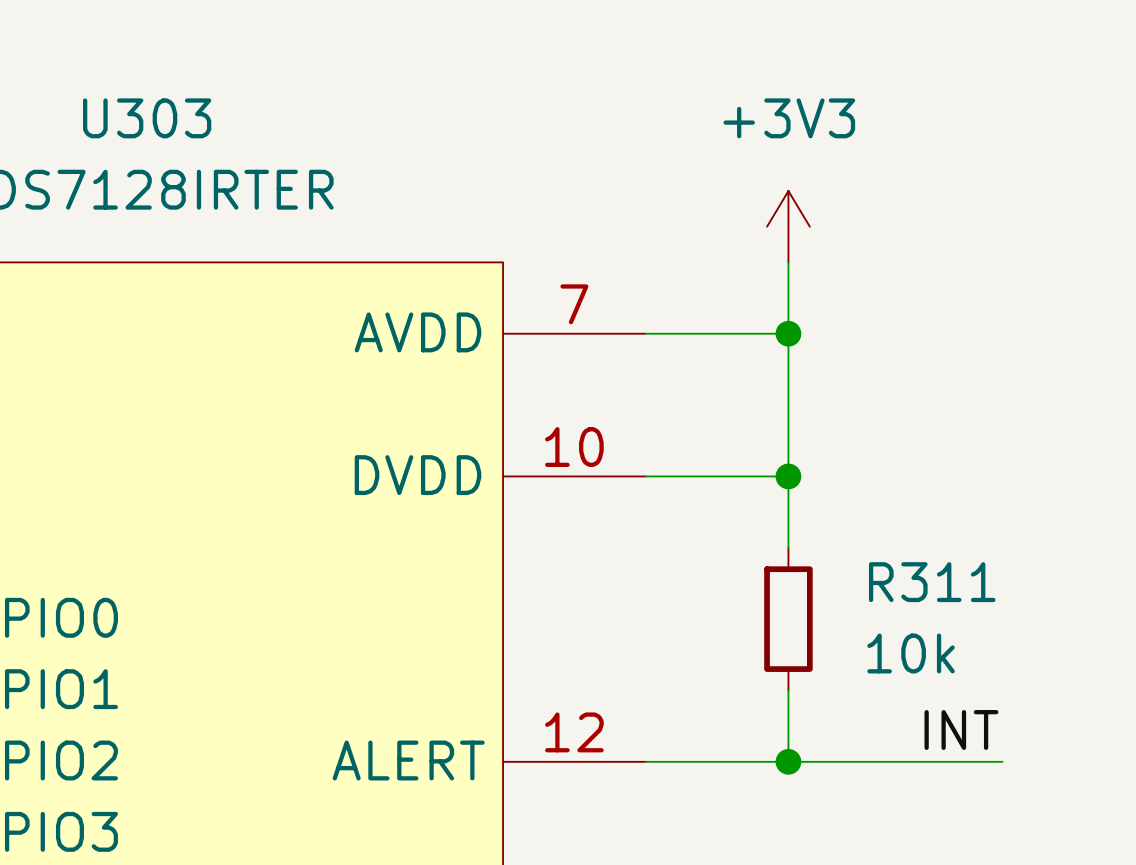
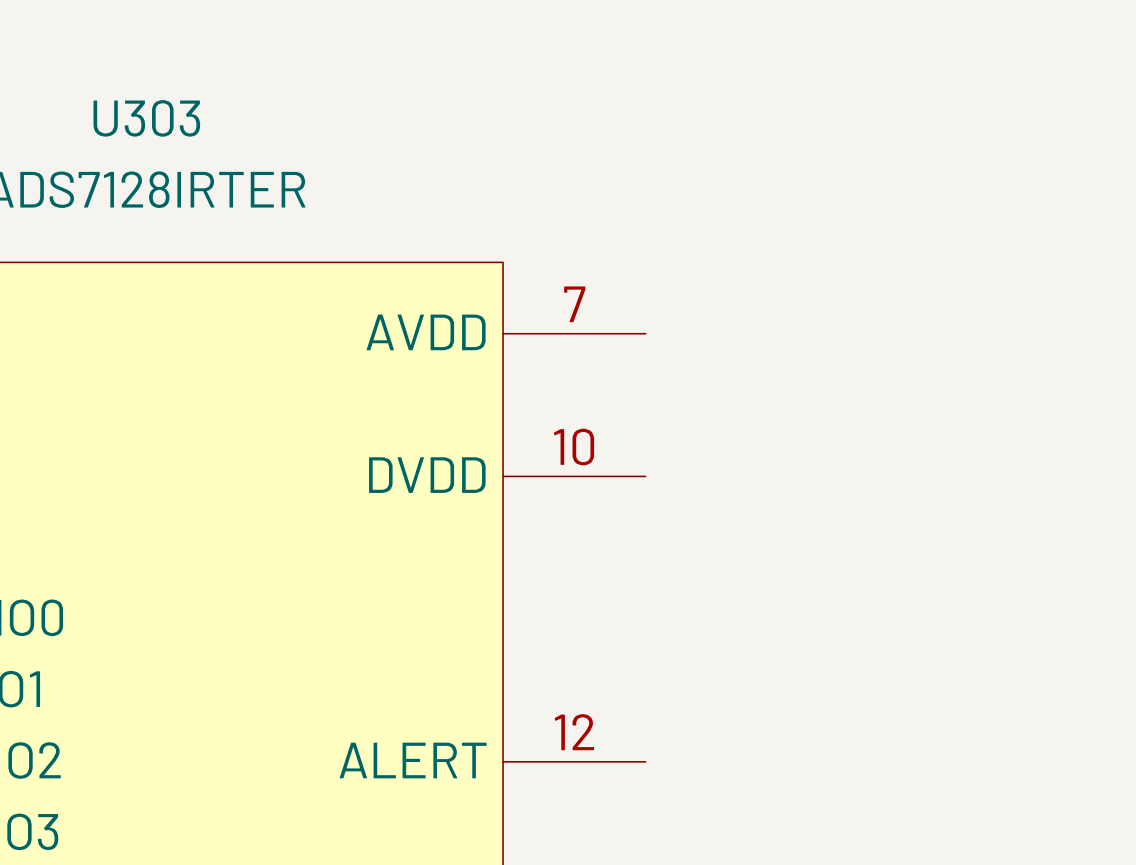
power symbol: +3V3 (788, 226) -> none
wire: (788, 262) (788, 547) -> none
wire: (645, 333) (788, 333) -> none
junction: (788, 333) -> none
wire: (645, 476) (788, 476) -> none
junction: (788, 476) -> none
R311: 10k (788, 619) -> none
wire: (788, 690) (788, 761) -> none
label: INT (961, 730) -> none
wire: (645, 761) (1002, 761) -> none
junction: (788, 761) -> none

